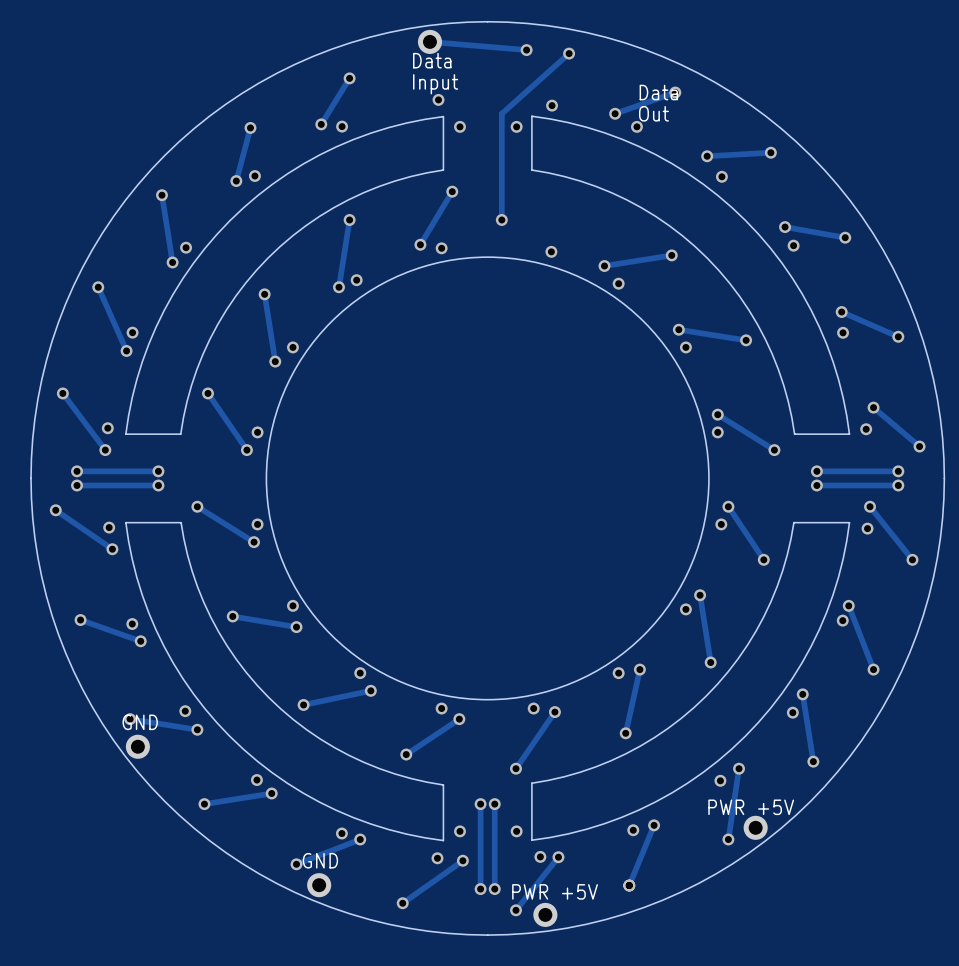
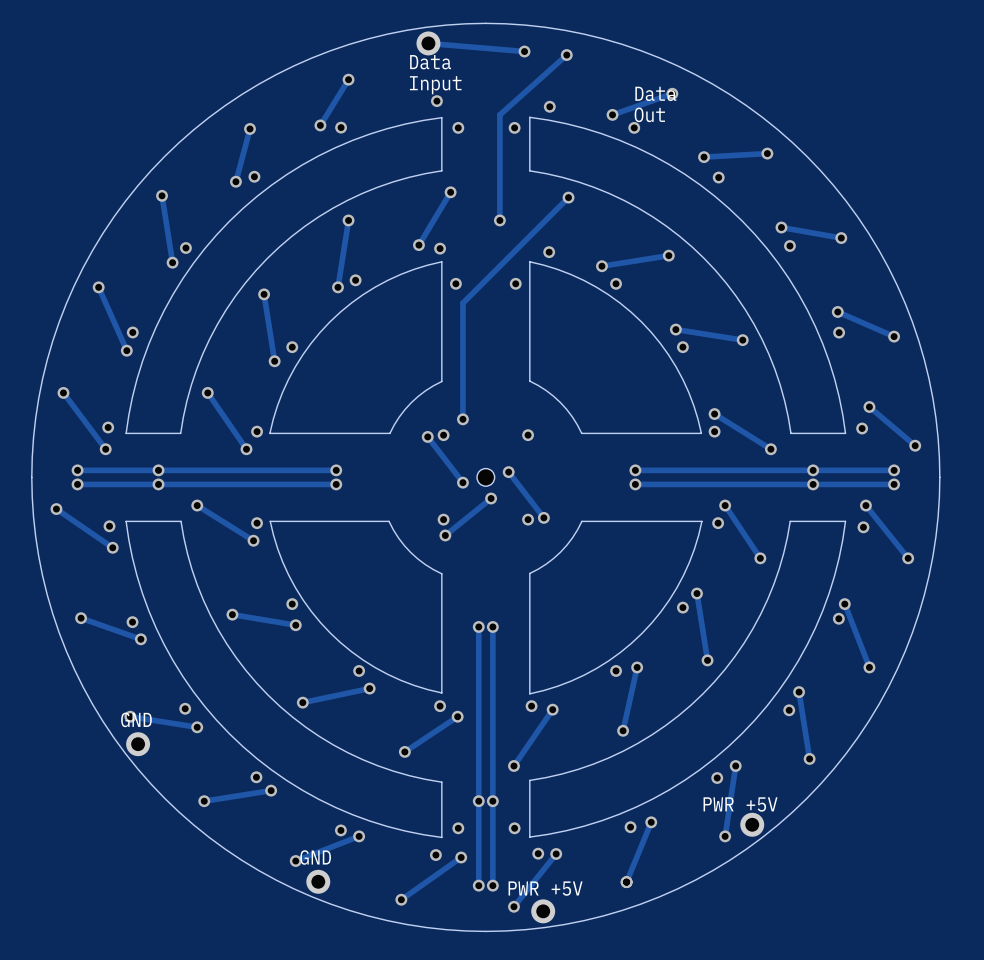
track: none -> (568, 197) (462, 303) (462, 419)
via: none -> (568, 197)
round board edge: [266, 256, 710, 700] -> none
board edge: none -> (441, 261) (441, 381) (425, 390) (411, 402) (399, 417) (389, 433) (269, 433) (277, 405) (288, 379) (302, 354) (330, 321) (351, 302) (387, 280) (414, 269) (441, 261)
via: none -> (455, 283)
via: none -> (515, 283)
via: none -> (462, 419)
board edge: none -> (581, 433) (701, 433) (693, 405) (682, 379) (660, 343) (641, 321) (619, 302) (583, 280) (557, 269) (529, 261) (529, 381) (546, 390) (560, 402) (572, 417) (581, 433)
via: none -> (443, 435)
via: none -> (528, 435)
track: none -> (427, 436) (462, 482)
via: none -> (427, 436)
track: none -> (336, 470) (158, 470)
via: none -> (336, 470)
via: none -> (635, 470)
track: none -> (813, 470) (635, 470)
track: none -> (508, 472) (543, 517)
via: none -> (508, 472)
hole: none -> (485, 477)
via: none -> (462, 482)
track: none -> (336, 484) (158, 484)
via: none -> (336, 484)
via: none -> (635, 484)
track: none -> (813, 484) (635, 484)
track: none -> (491, 498) (445, 535)
via: none -> (491, 498)
via: none -> (543, 517)
via: none -> (443, 519)
via: none -> (528, 519)
board edge: none -> (389, 521) (270, 521) (277, 548) (288, 575) (311, 611) (330, 632) (351, 651) (387, 674) (414, 685) (441, 692) (441, 573) (425, 564) (410, 552) (398, 537) (389, 521)
board edge: none -> (701, 521) (581, 521) (572, 537) (560, 552) (546, 564) (529, 573) (529, 693) (570, 681) (596, 668) (620, 652) (641, 633) (660, 612) (676, 588) (689, 562) (701, 521)
via: none -> (445, 535)
track: none -> (478, 626) (478, 801)
via: none -> (478, 626)
track: none -> (492, 626) (492, 801)
via: none -> (492, 626)

